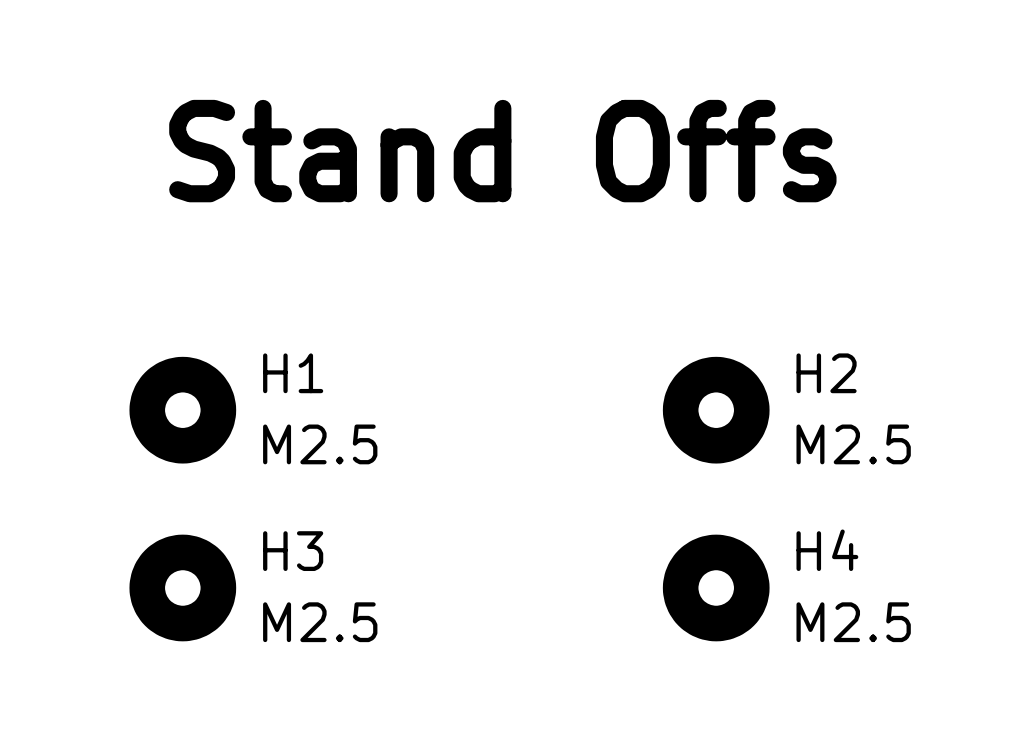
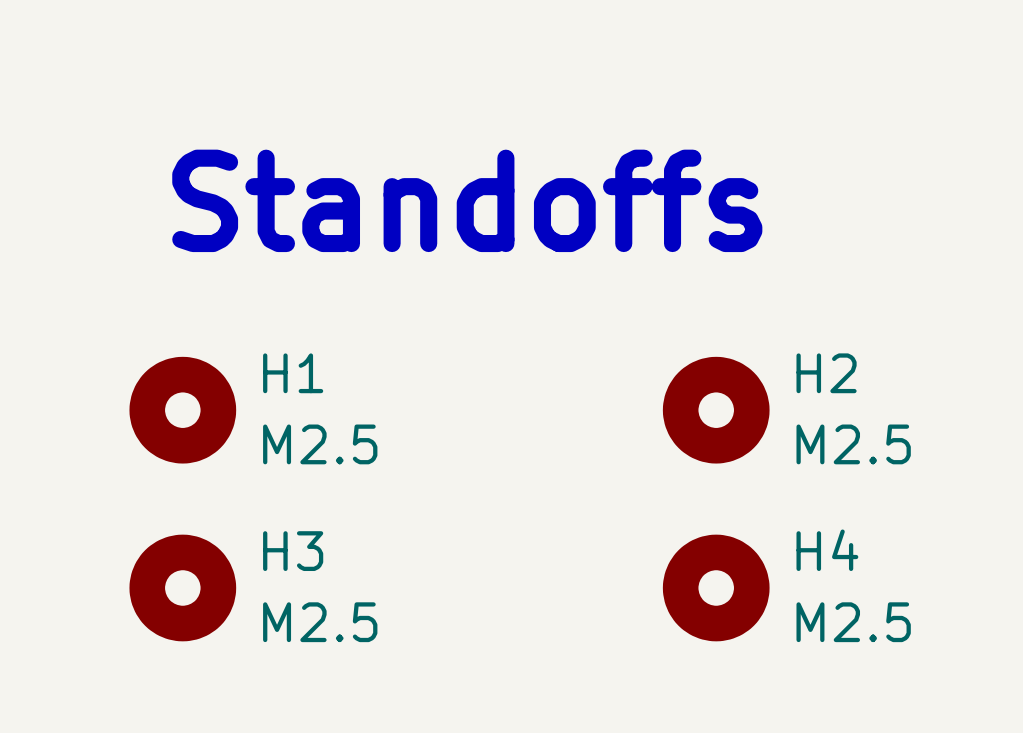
text: Stand Offs (502, 151) -> Standoffs (467, 200)

